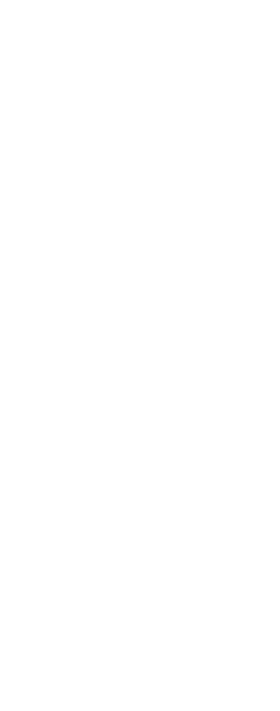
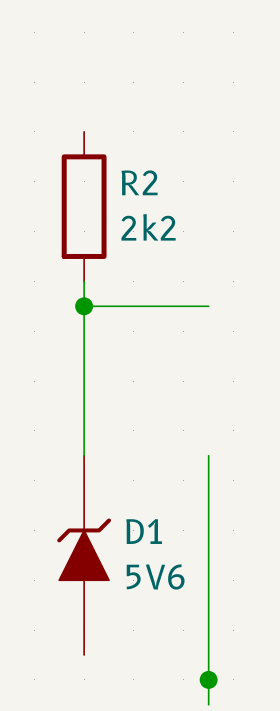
R2: none -> 2k2 (84, 206)
wire: none -> (84, 281) (84, 455)
wire: none -> (84, 306) (208, 306)
junction: none -> (84, 306)
wire: none -> (208, 455) (208, 704)
D1: none -> 5V6 (84, 555)
junction: none -> (208, 679)

